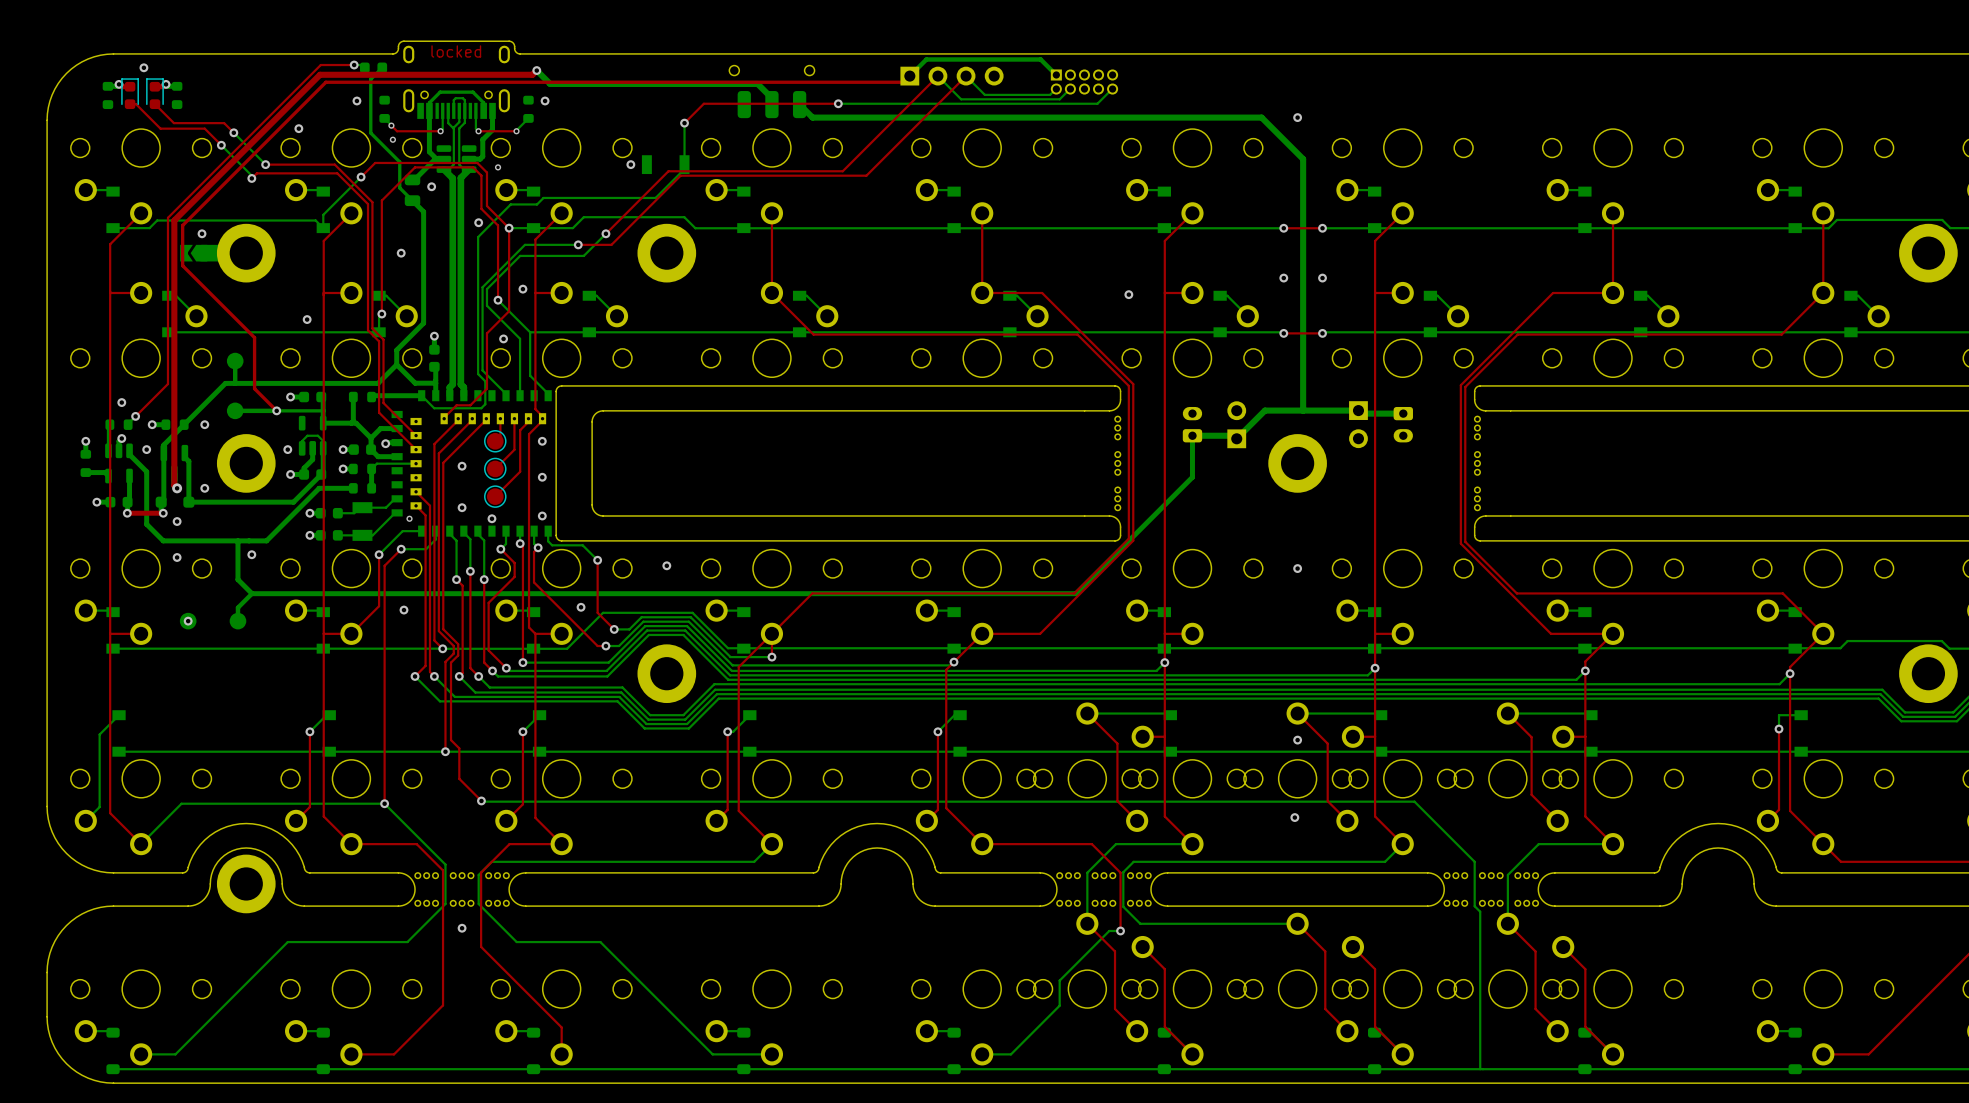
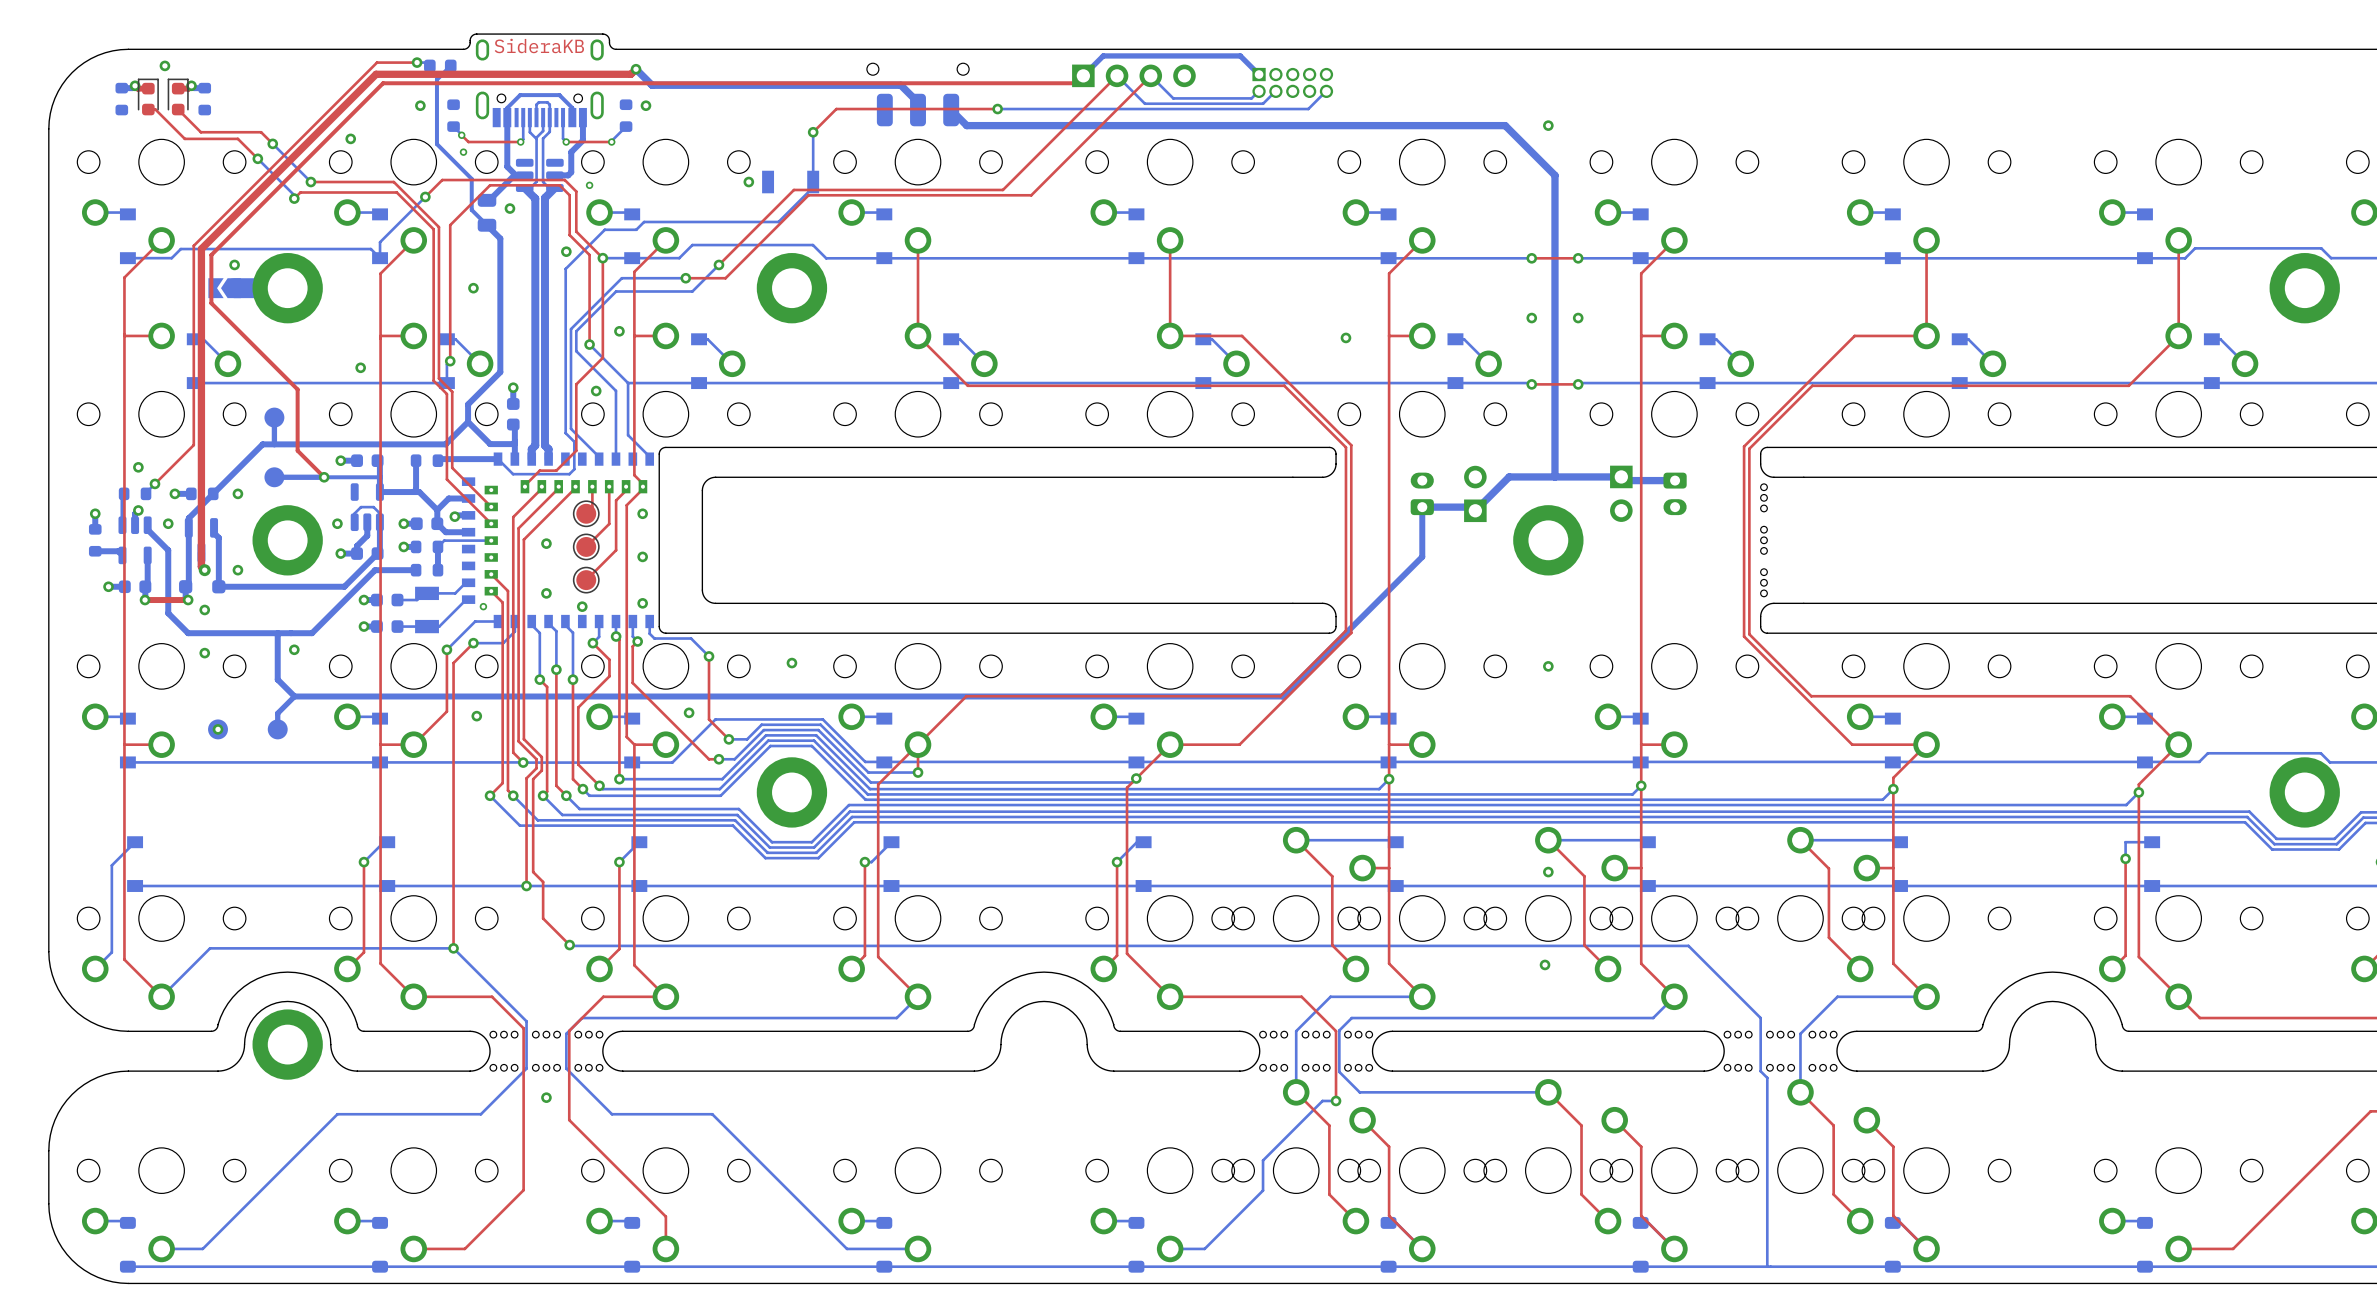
text: locked (456, 51) -> SideraKB (539, 46)
part: (1117, 463) -> none

